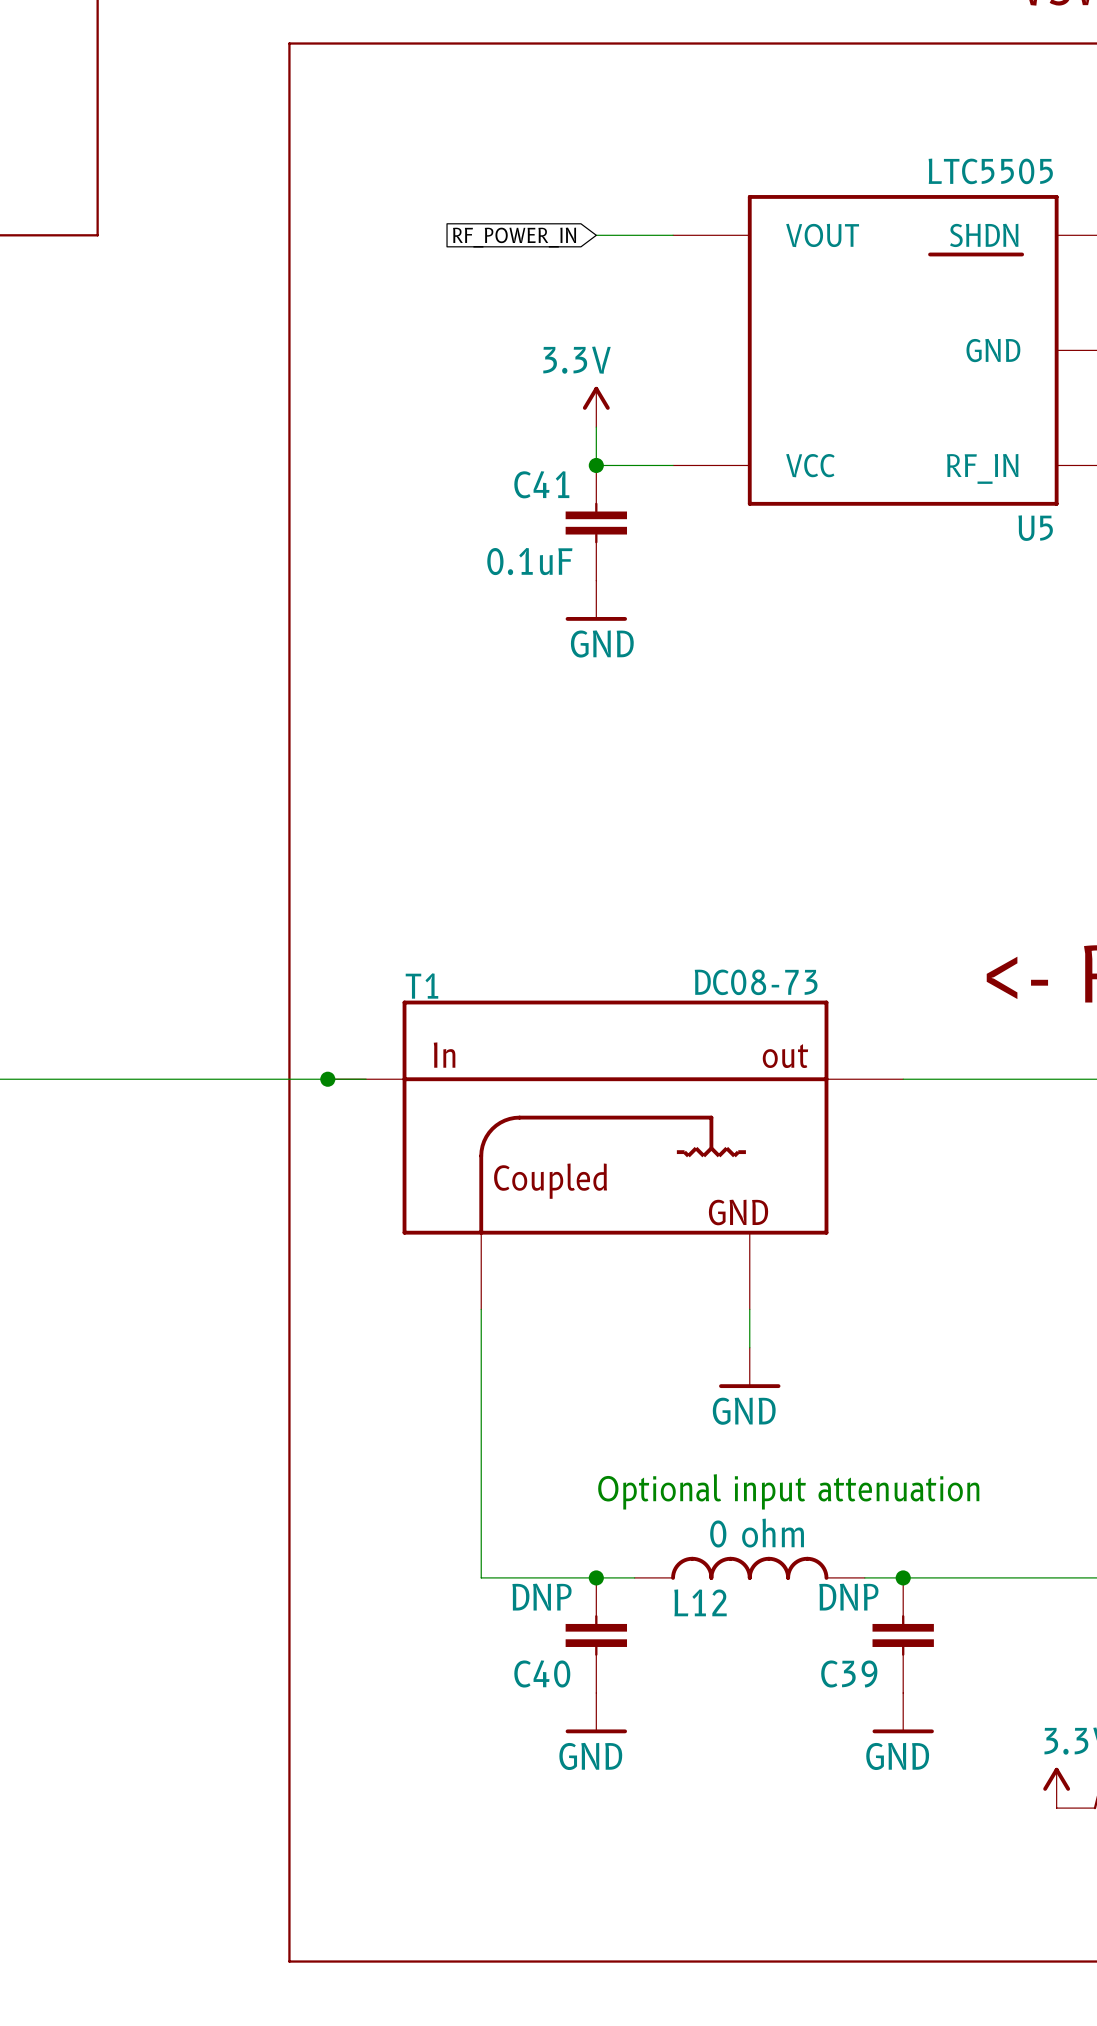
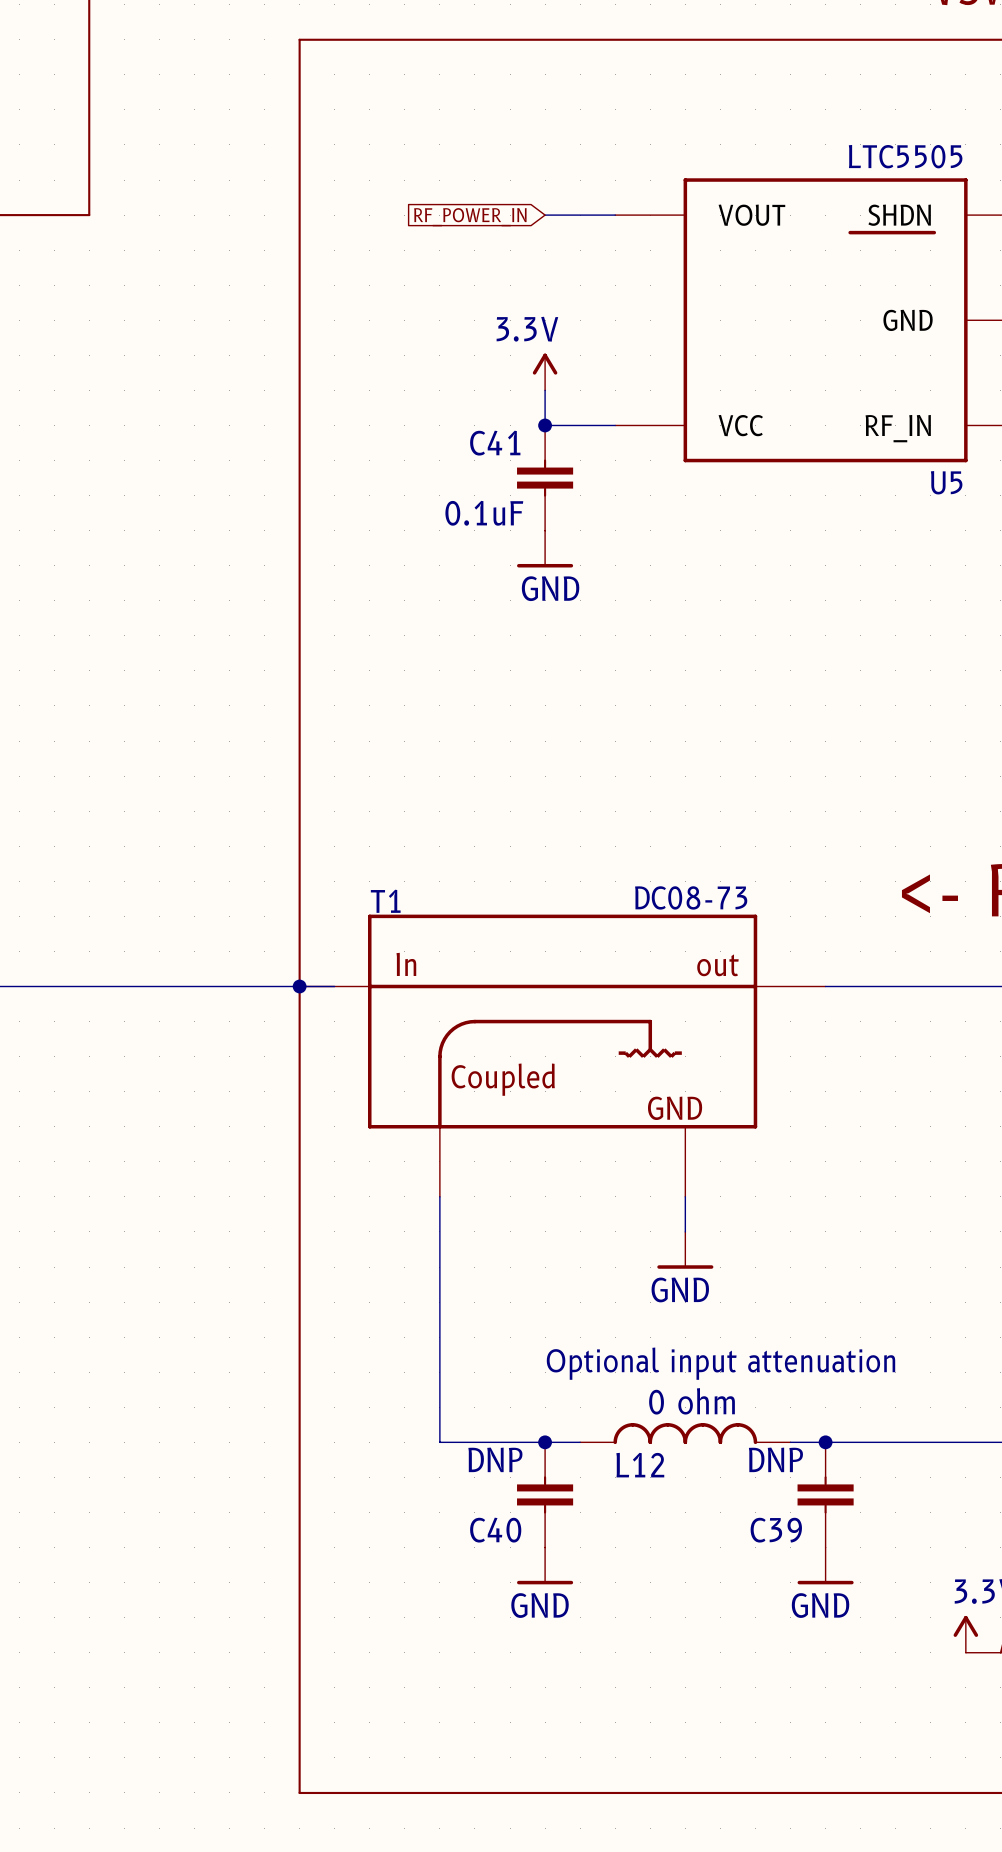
line: (327, 43) (289, 43) (289, 1961) (327, 1961) -> (299, 39) (299, 1792)

